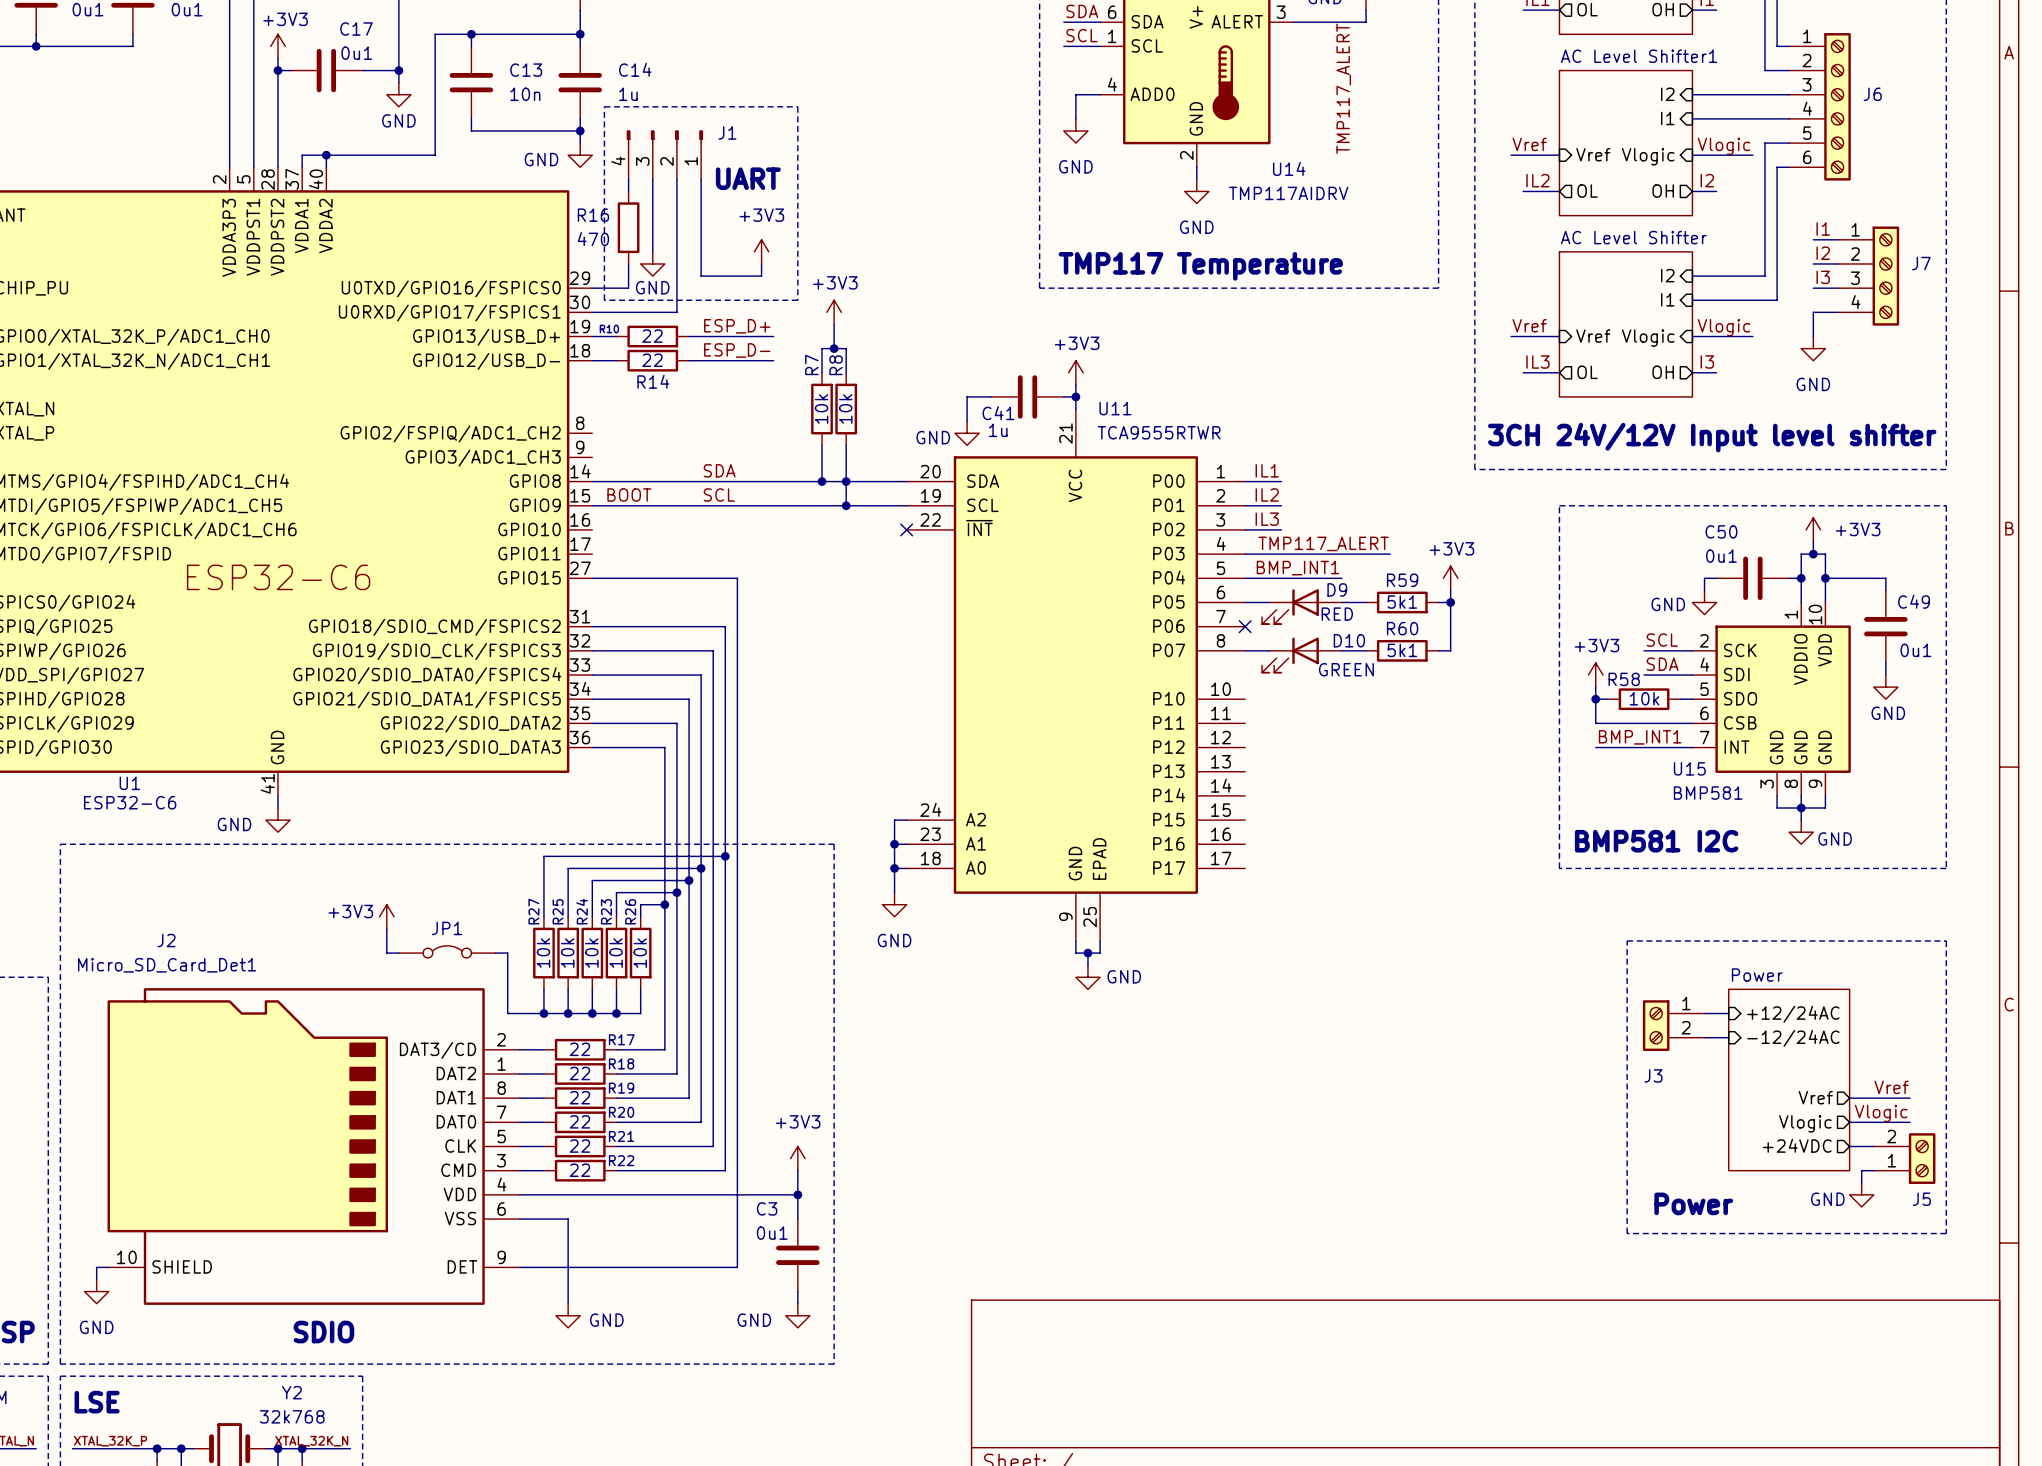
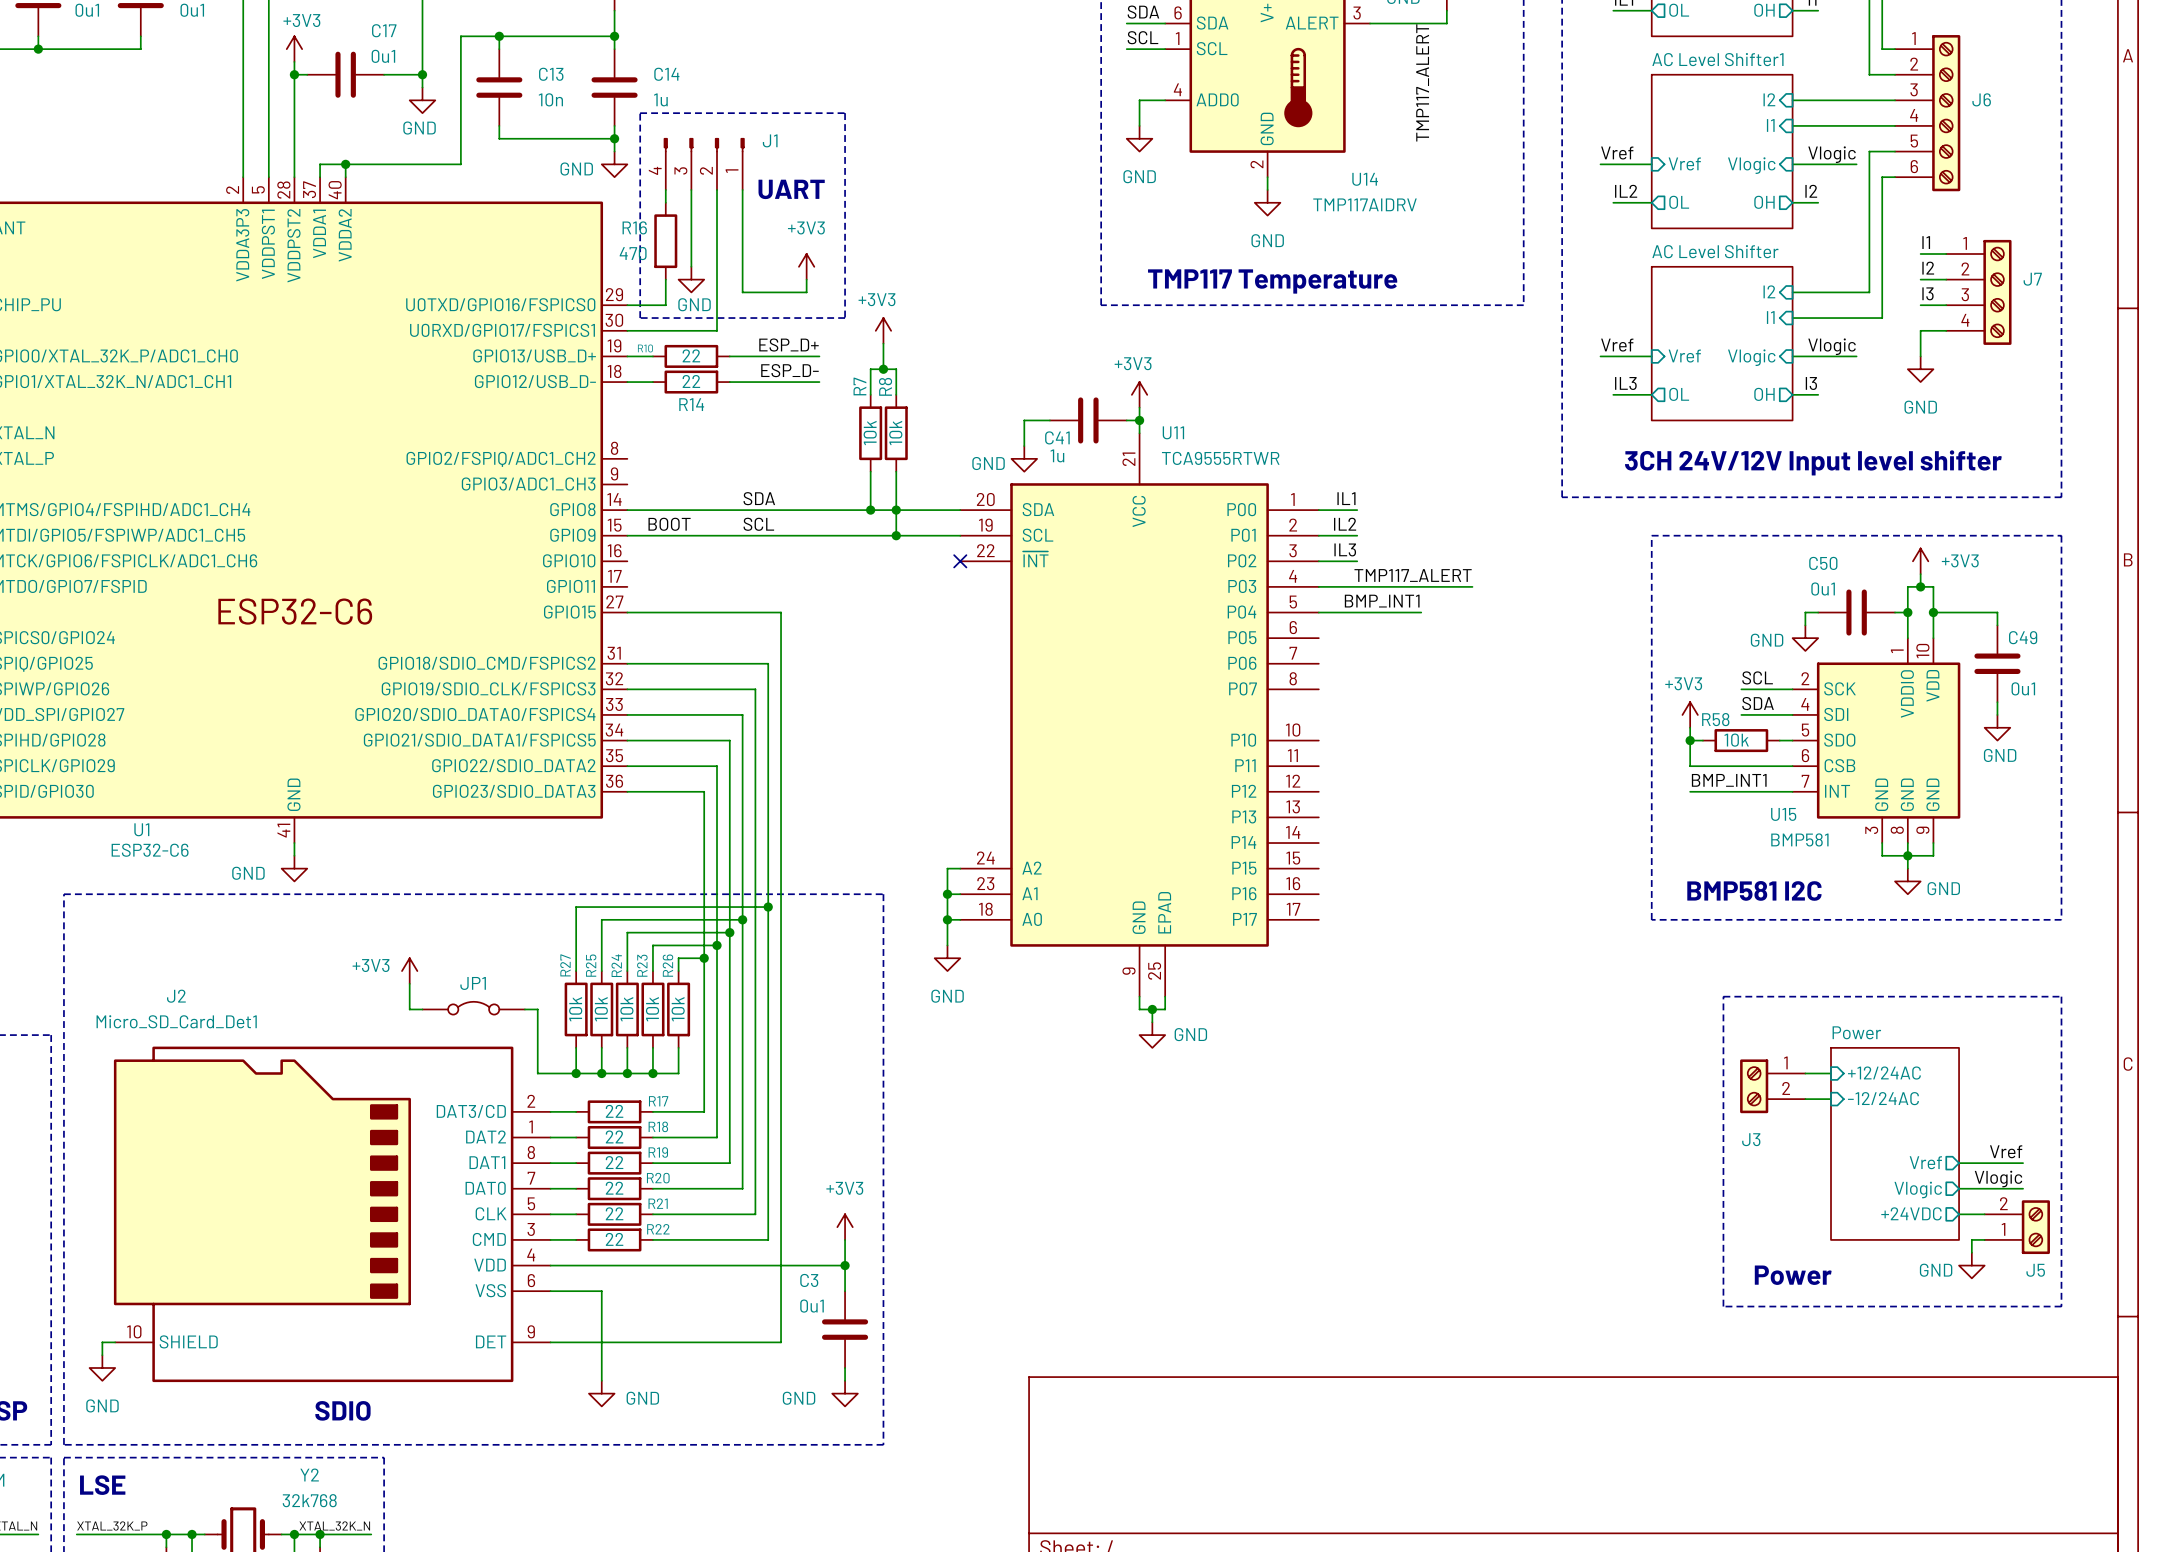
power symbol: +3V3 (1450, 578) -> none
wire: (1450, 590) (1450, 650) (1438, 650) -> none
wire: (1245, 602) (1269, 602) -> none
wire: (1341, 602) (1366, 602) -> none
R59: 5k1 (1402, 602) -> none
wire: (1438, 602) (1450, 602) -> none
junction: (1450, 602) -> none
D9: RED (1301, 606) -> none
no-connect mark: (1245, 626) -> none
wire: (1245, 650) (1269, 650) -> none
wire: (1341, 650) (1366, 650) -> none
R60: 5k1 (1402, 650) -> none
D10: GREEN (1301, 655) -> none

